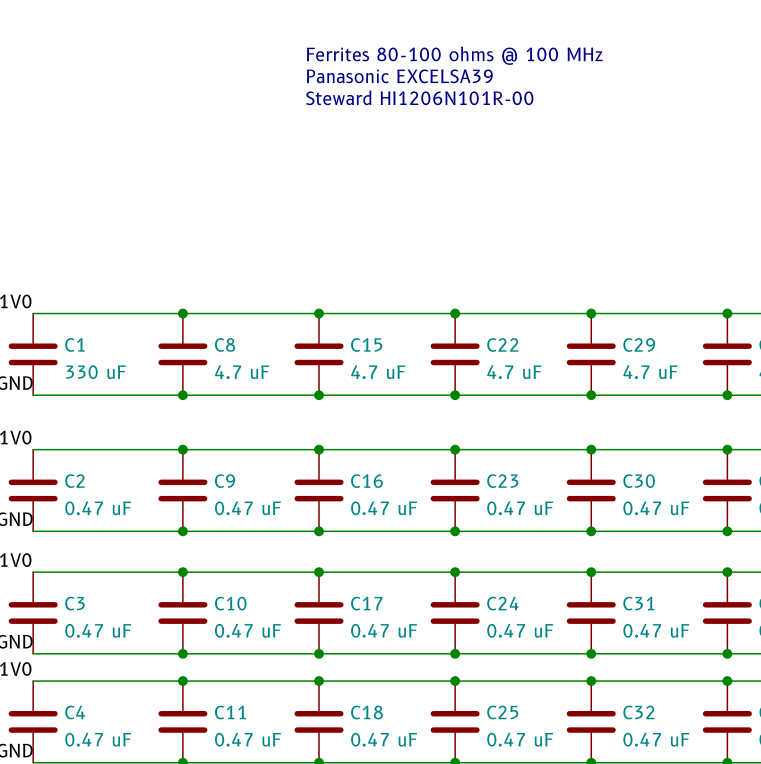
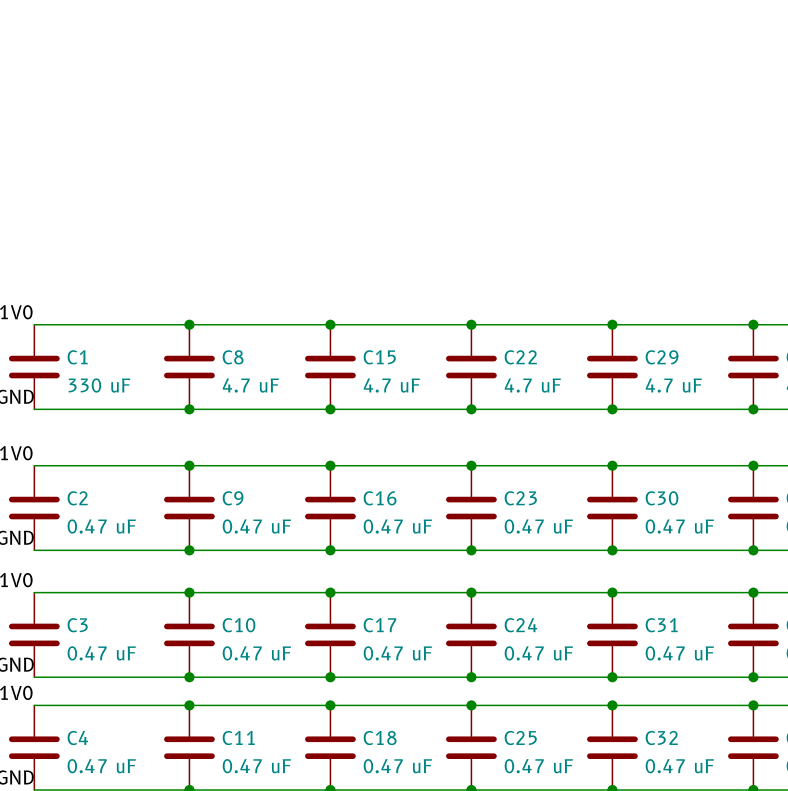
text: Ferrites 80-100 ohms @ 100 MHz (454, 55) -> none
text: Panasonic EXCELSA39 (399, 76) -> none
text: Steward HI1206N101R-00 (419, 97) -> none

